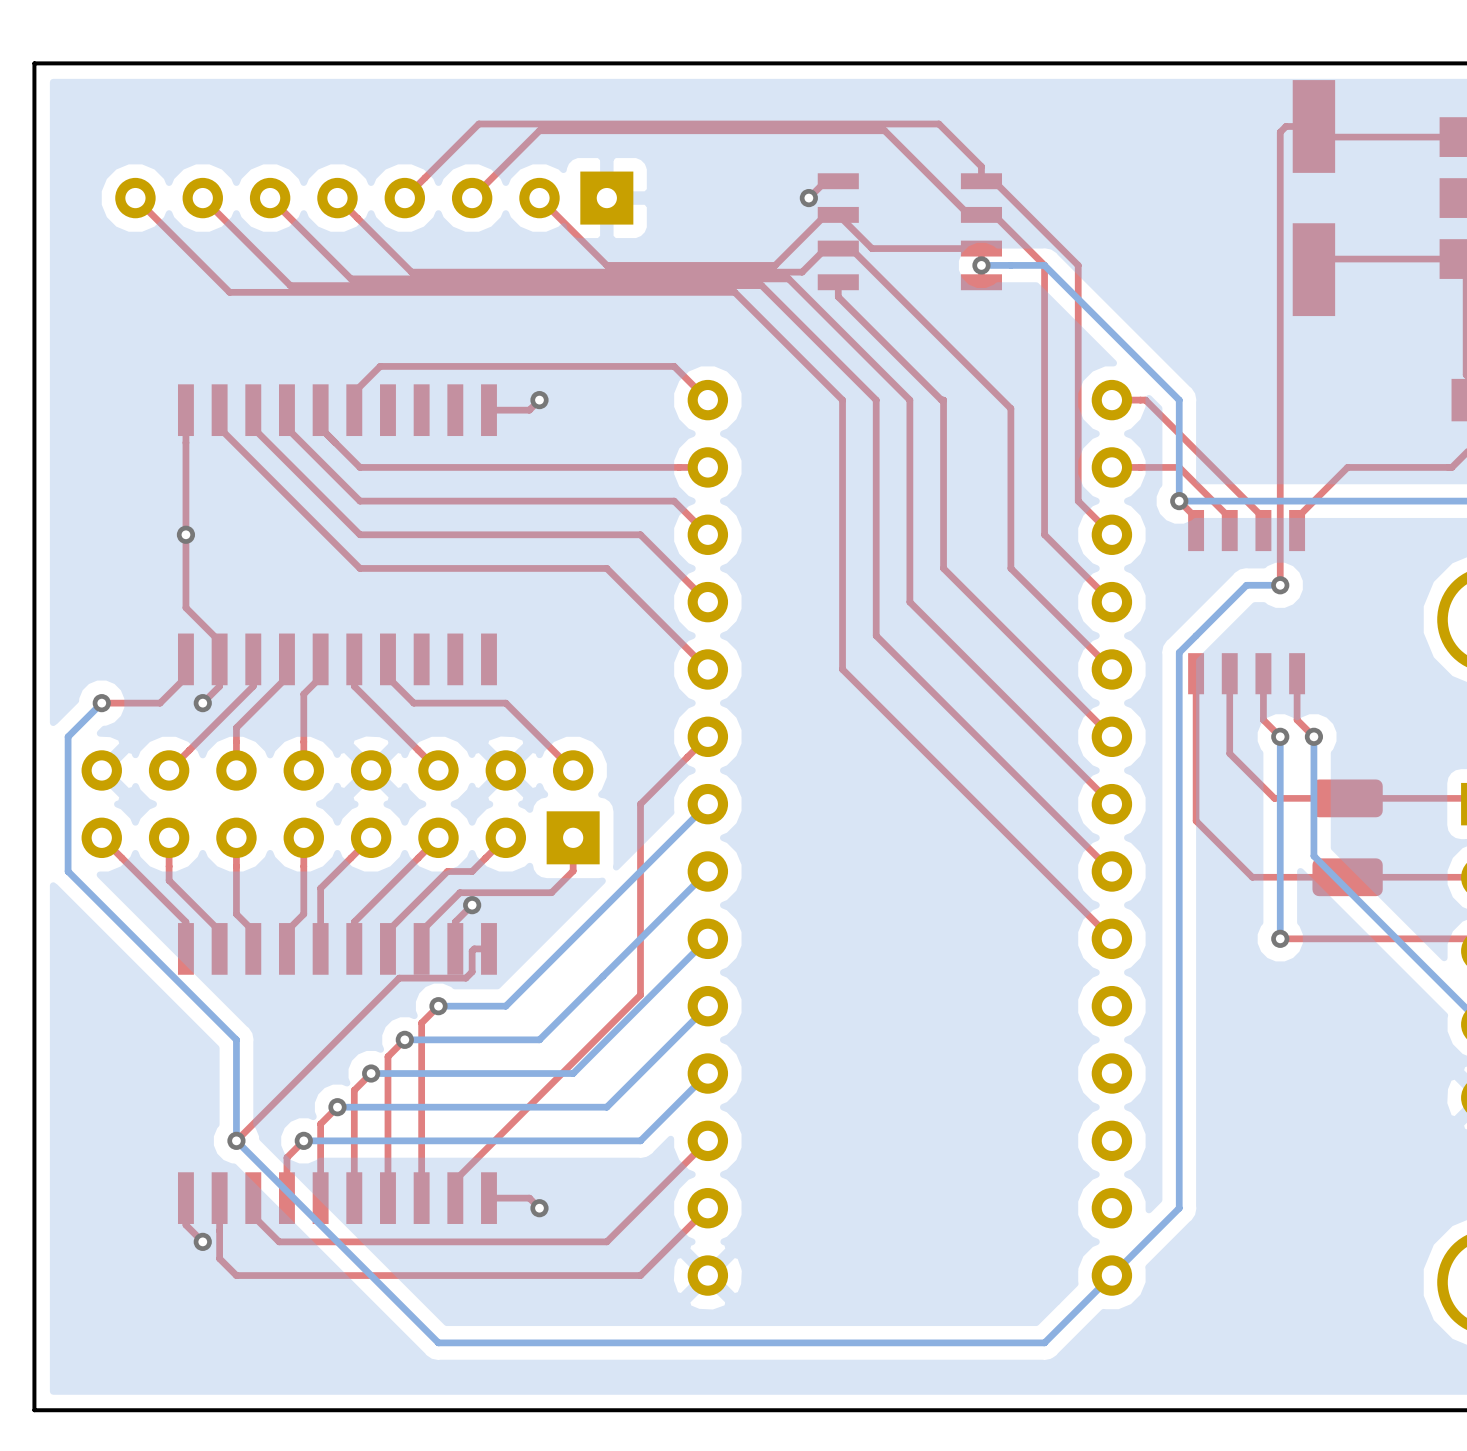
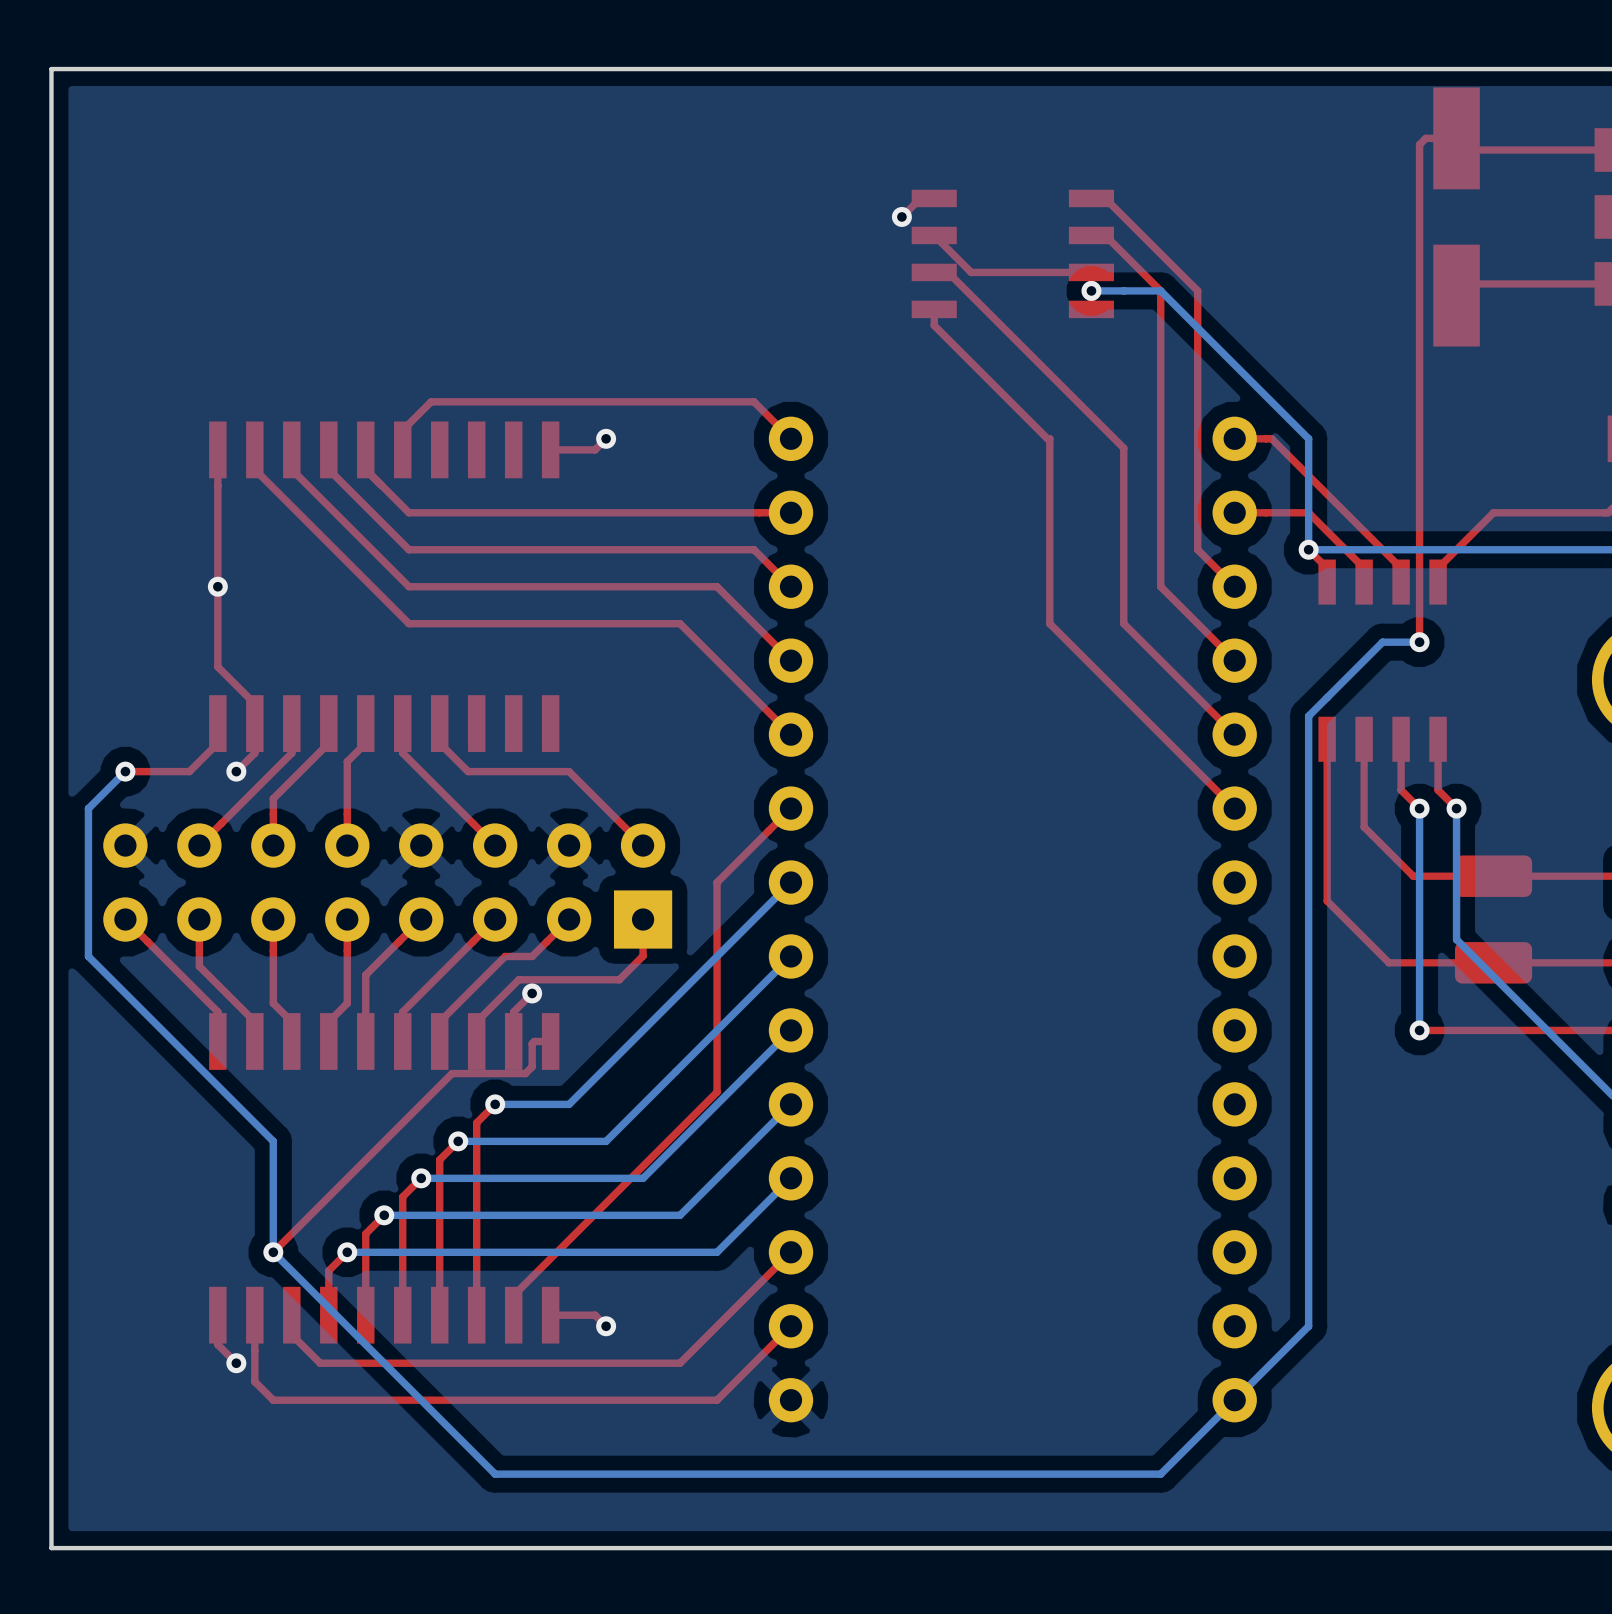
top track: (981, 181) (981, 166) (938, 123) (478, 123) (404, 198) -> none
top track: (135, 198) (229, 292) (734, 292) (842, 400) (842, 669) (1111, 938) -> none
top track: (202, 198) (290, 285) (761, 285) (876, 400) (876, 635) (1111, 871) -> none
top track: (270, 198) (350, 278) (788, 278) (909, 400) (909, 602) (1111, 804) -> none
top track: (337, 198) (411, 272) (802, 272) (825, 248) (838, 248) -> none
part: (374, 198) -> none
top track: (472, 198) (539, 130) (884, 130) (968, 214) (981, 214) -> none
top track: (539, 198) (606, 265) (775, 265) (825, 214) (838, 214) -> none

